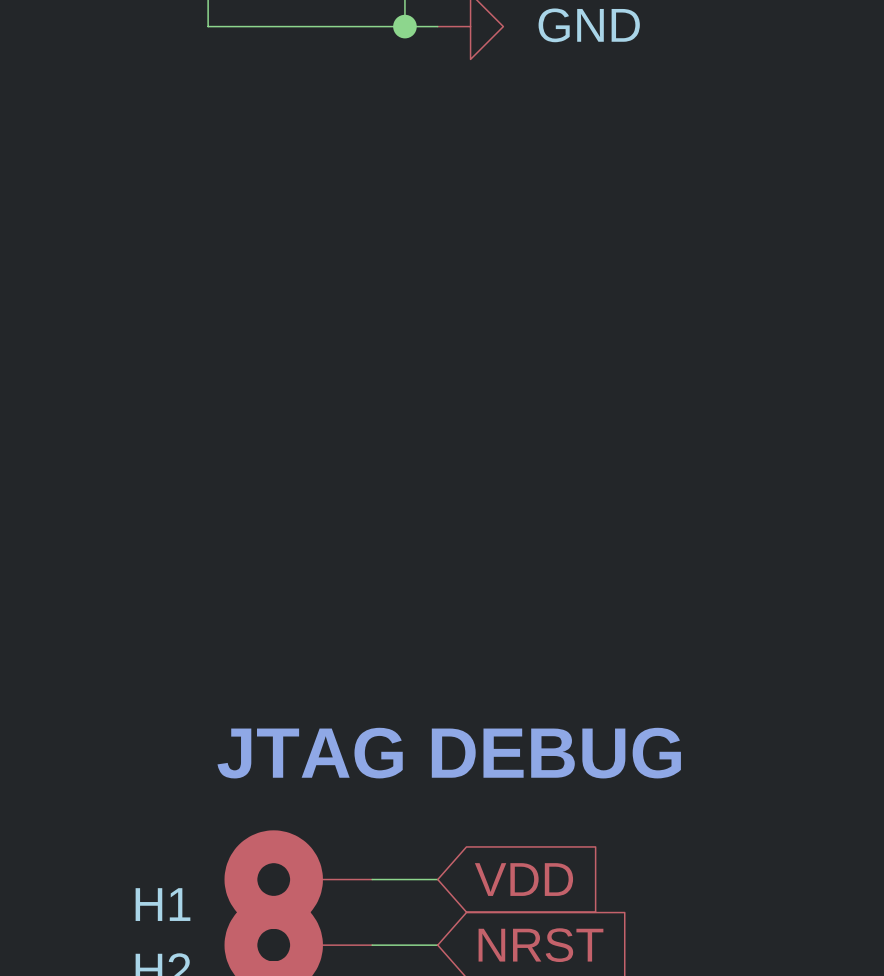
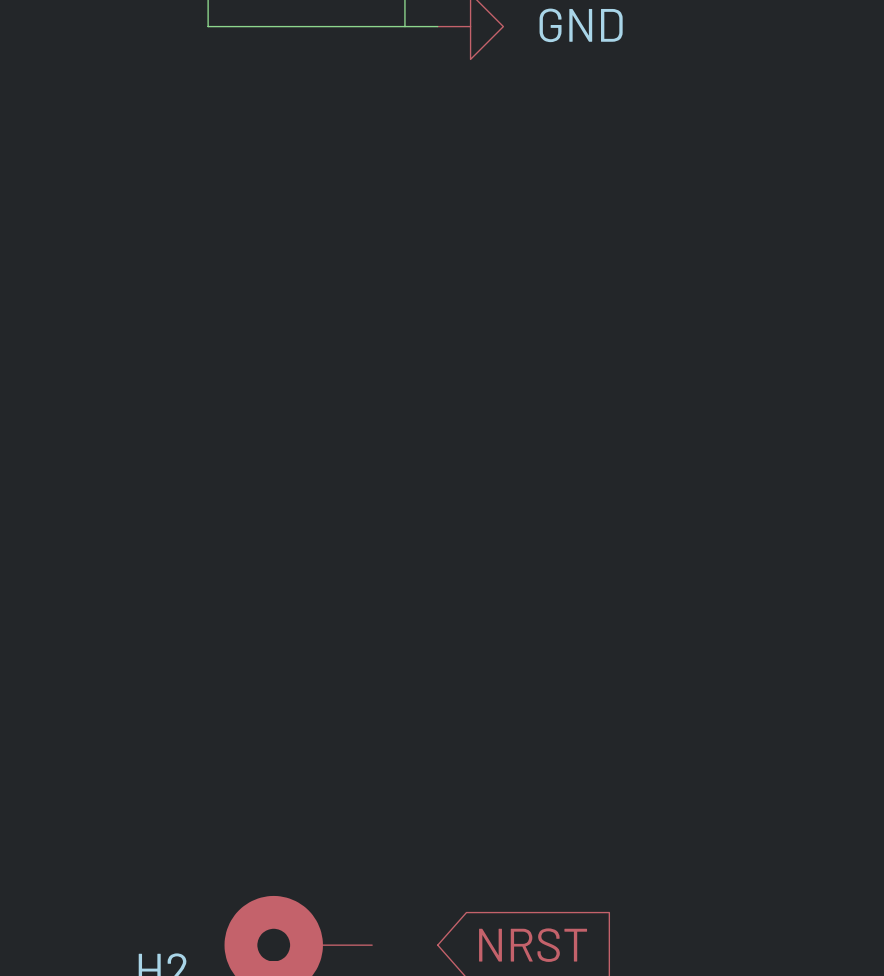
junction: (404, 26) -> none
text: JTAG DEBUG (449, 753) -> none
H1: (298, 879) -> none
wire: (372, 879) (437, 879) -> none
global label: VDD (523, 879) -> none
wire: (372, 945) (437, 945) -> none

